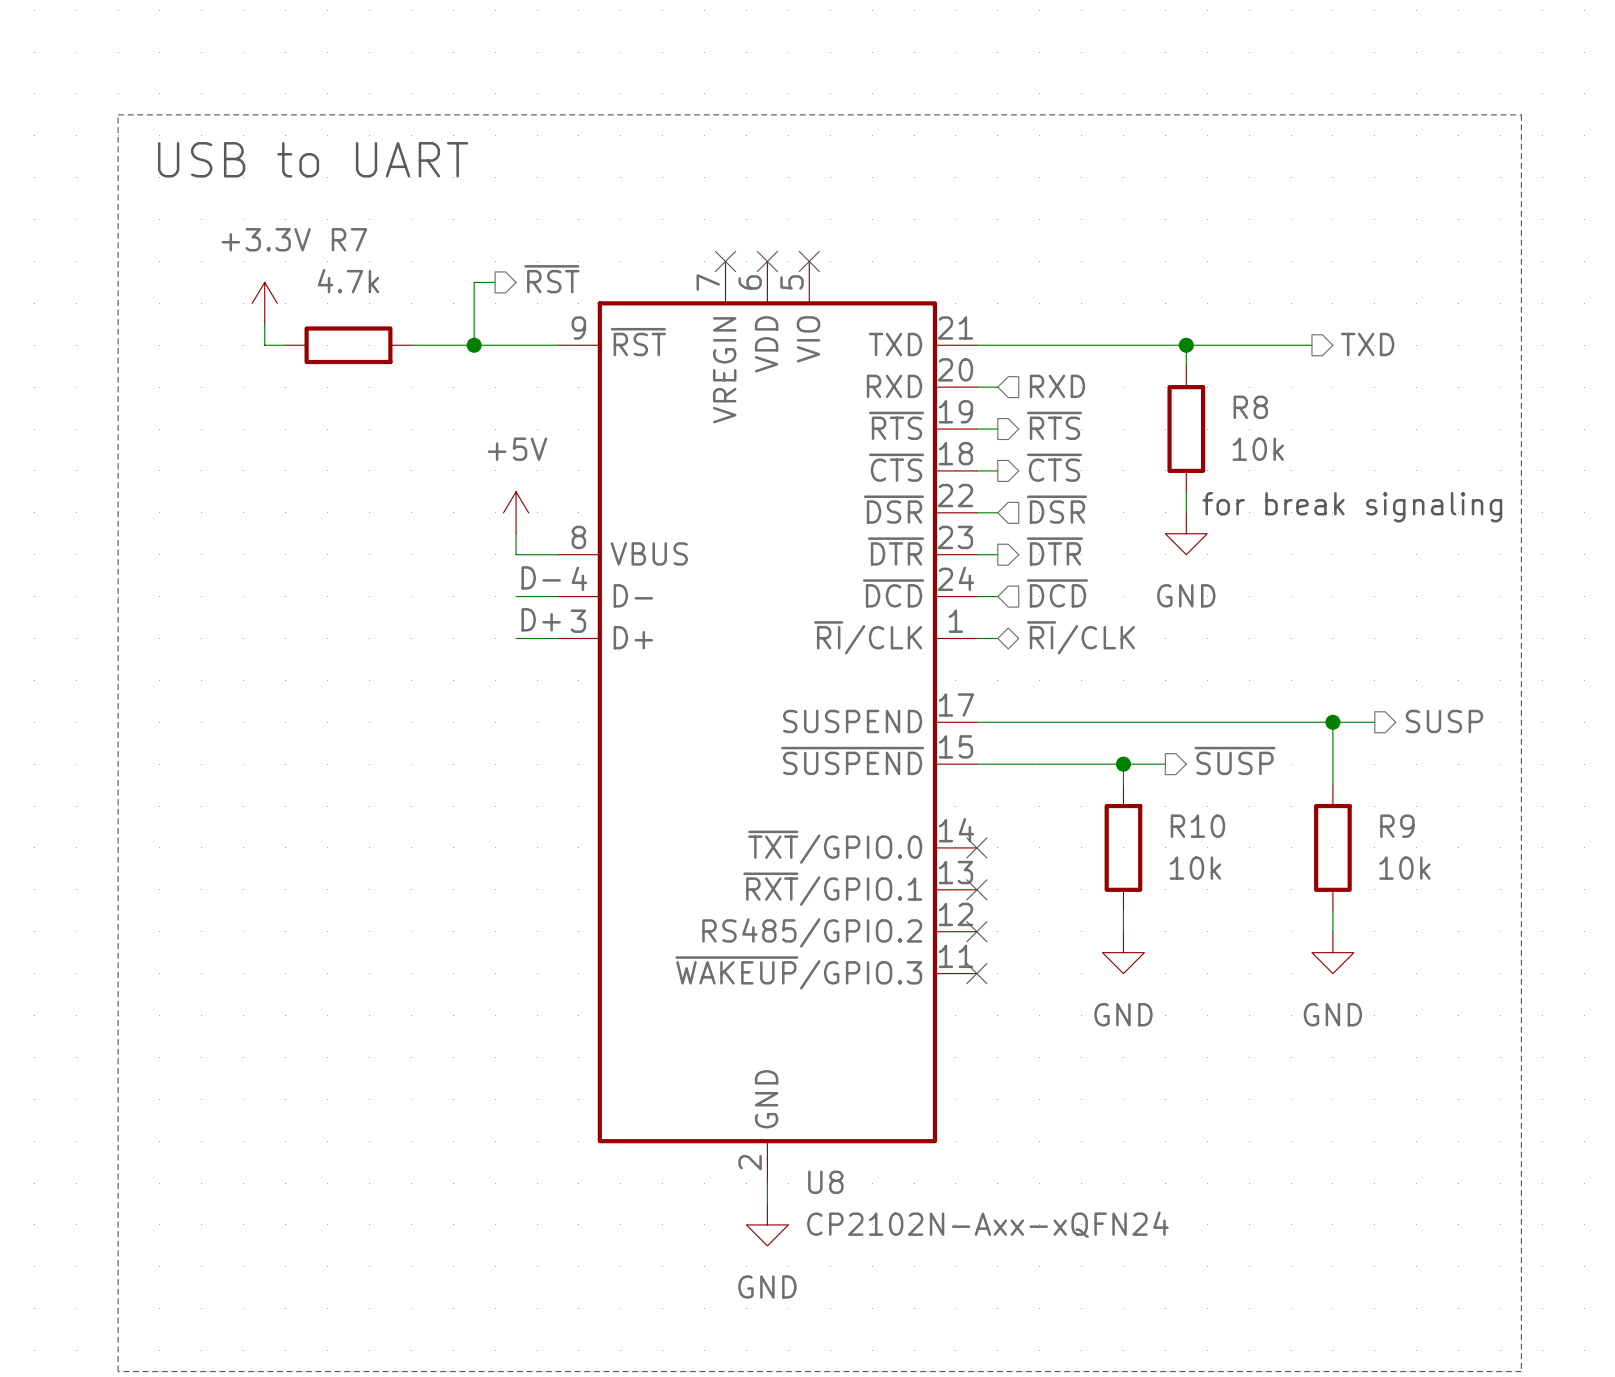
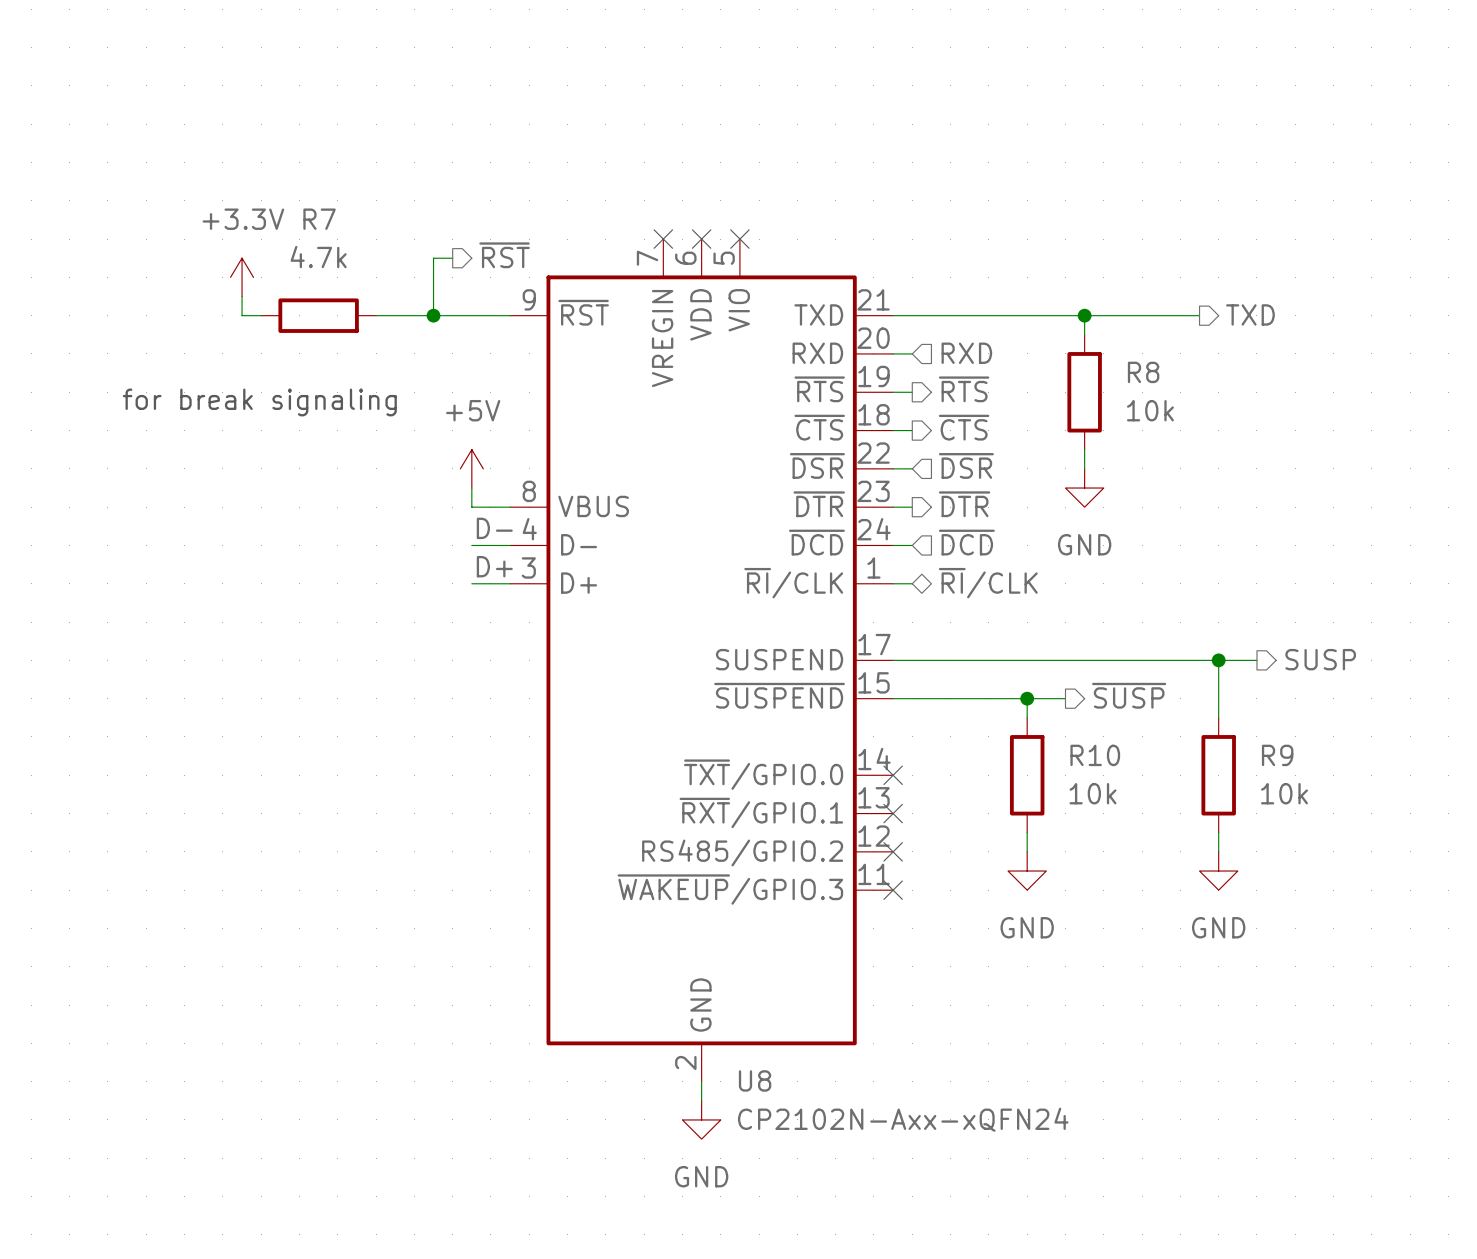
line: (118, 114) (1521, 114) (1521, 1371) (118, 1371) (118, 114) -> none
text: USB to UART (313, 159) -> none
text: none -> for break signaling (259, 402)
text: for break signaling (1352, 507) -> none

